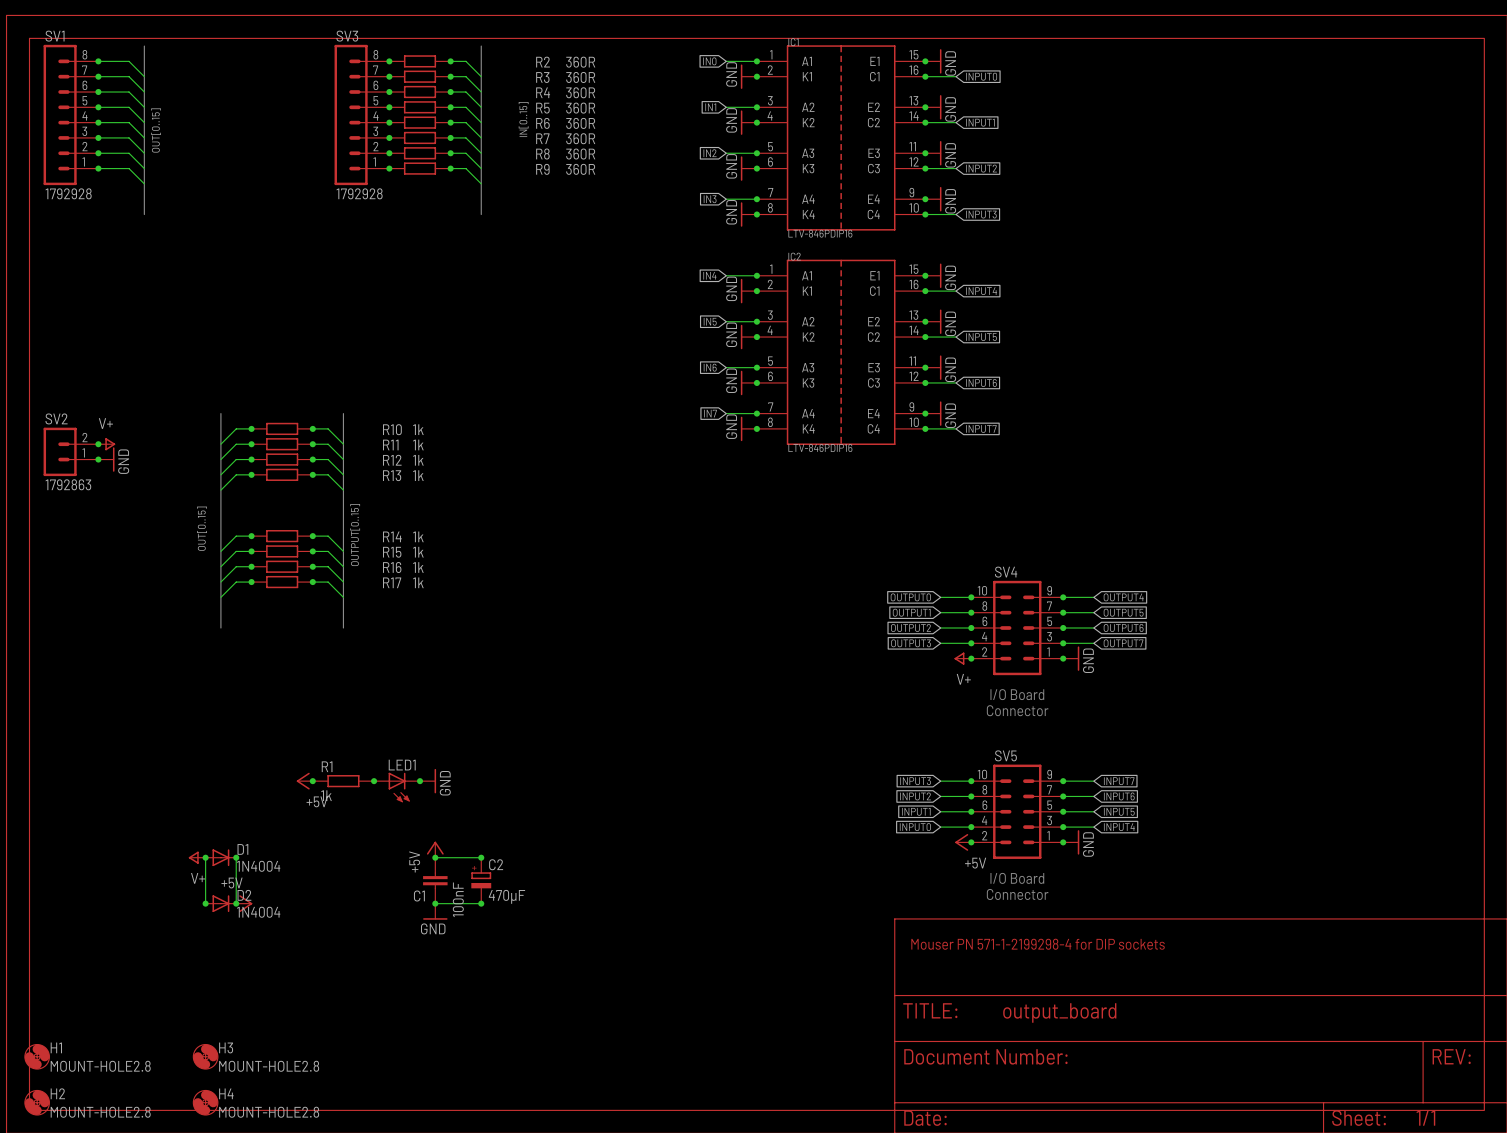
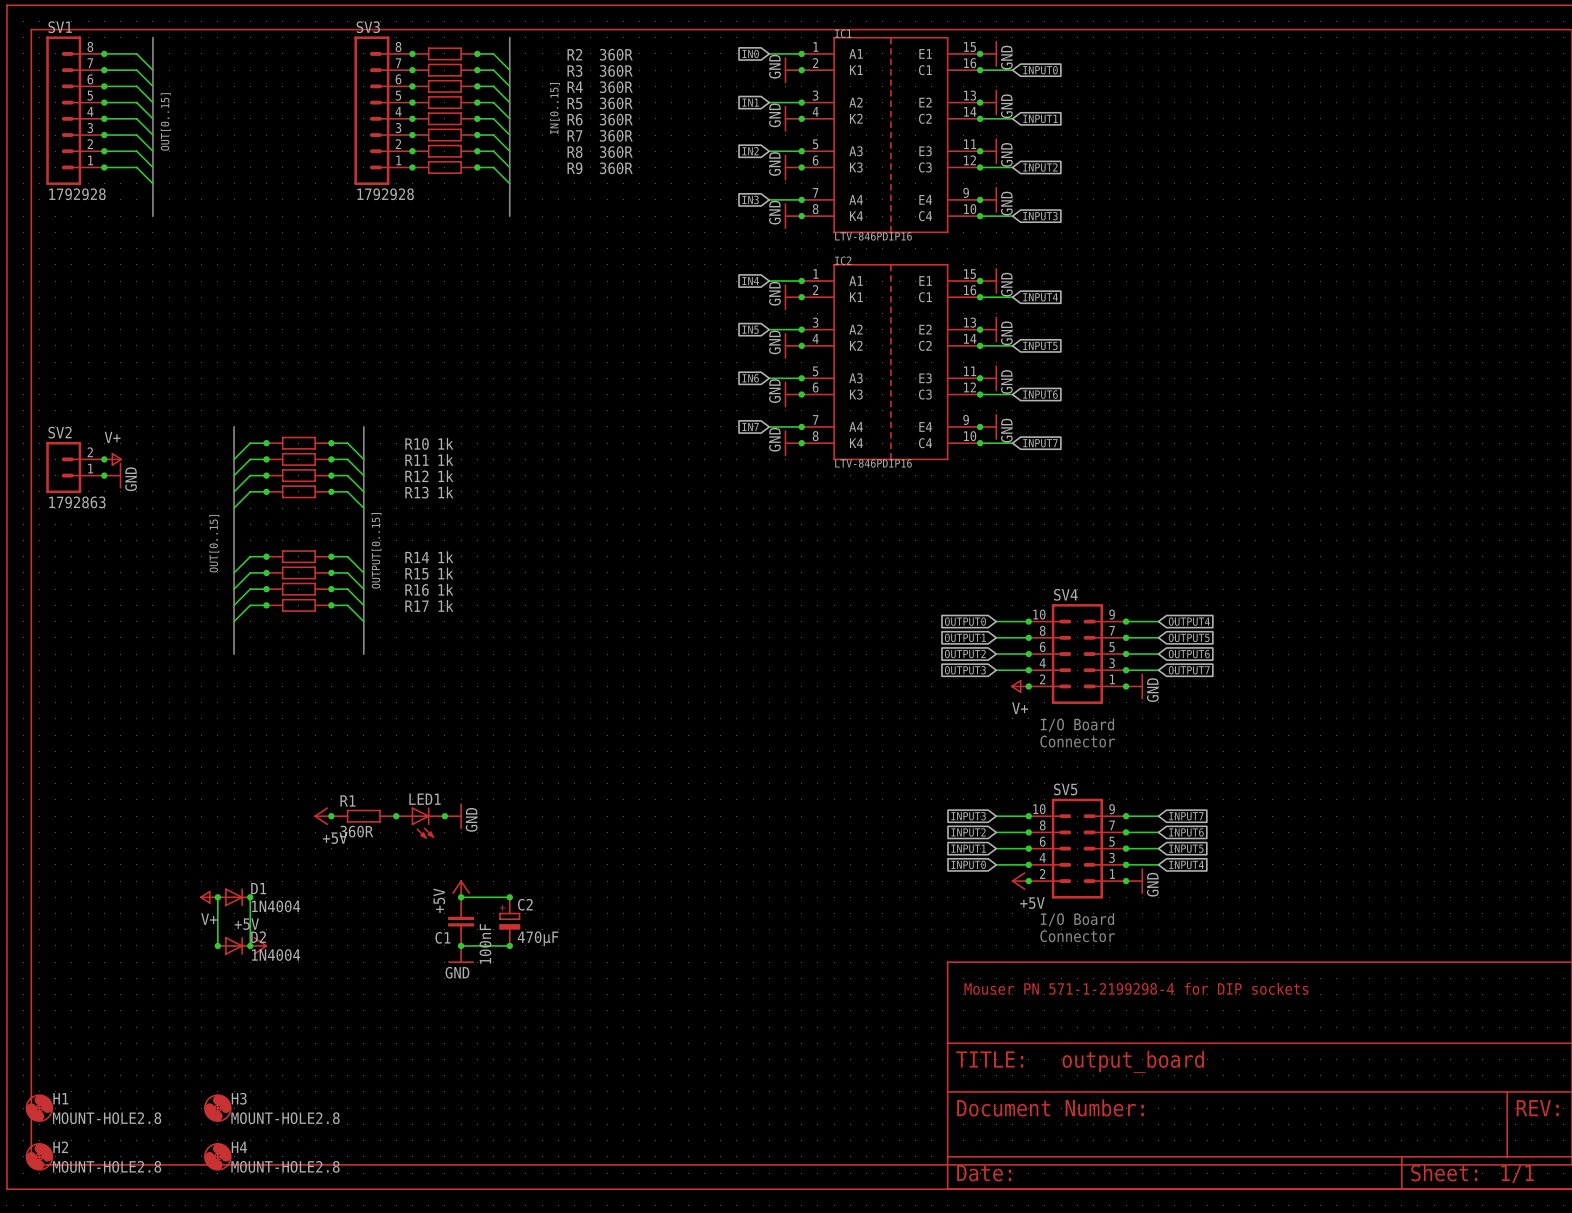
R1 value: 1k (326, 795) -> 360R (356, 831)

